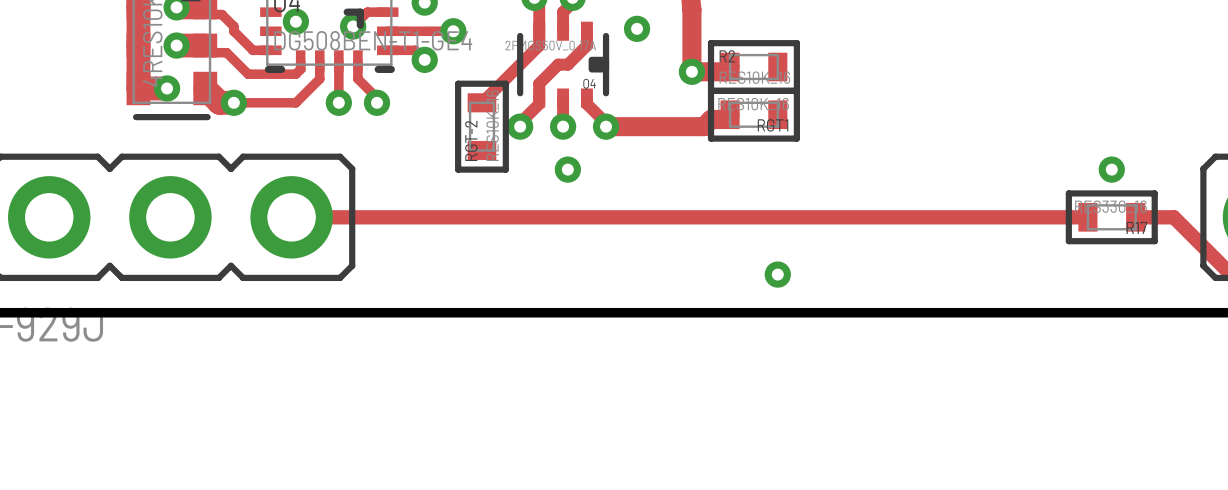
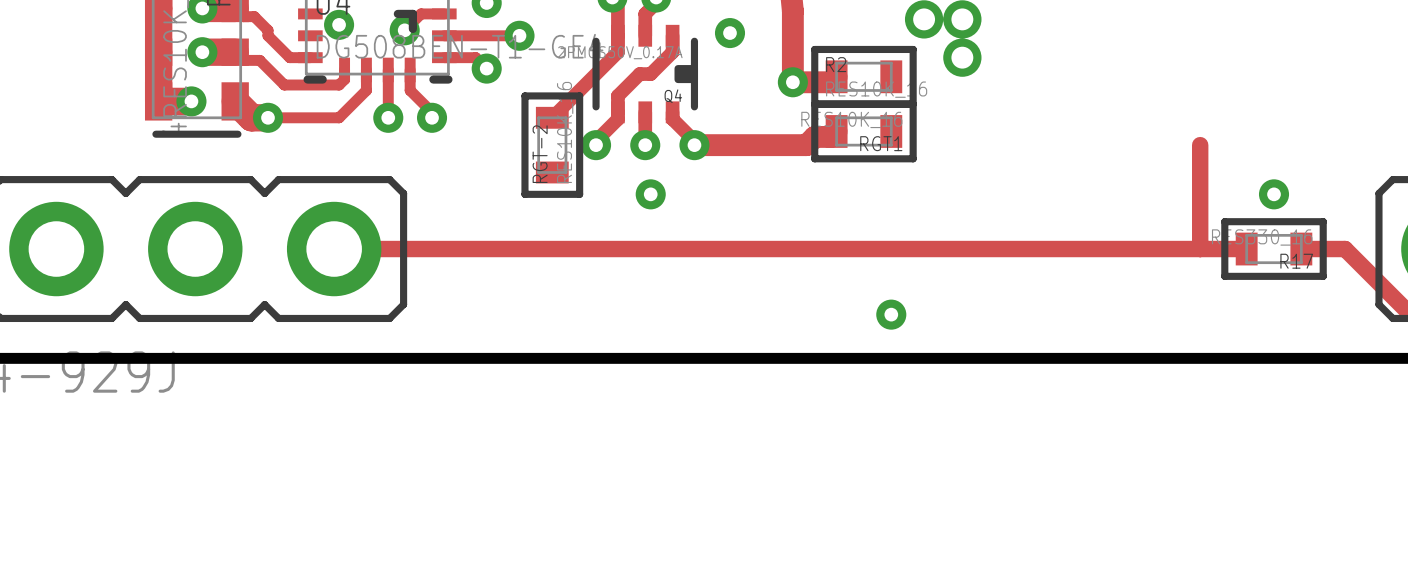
via: none -> (924, 19)
via: none -> (962, 19)
via: none -> (962, 57)
track: none -> (1200, 145) (1200, 249)

